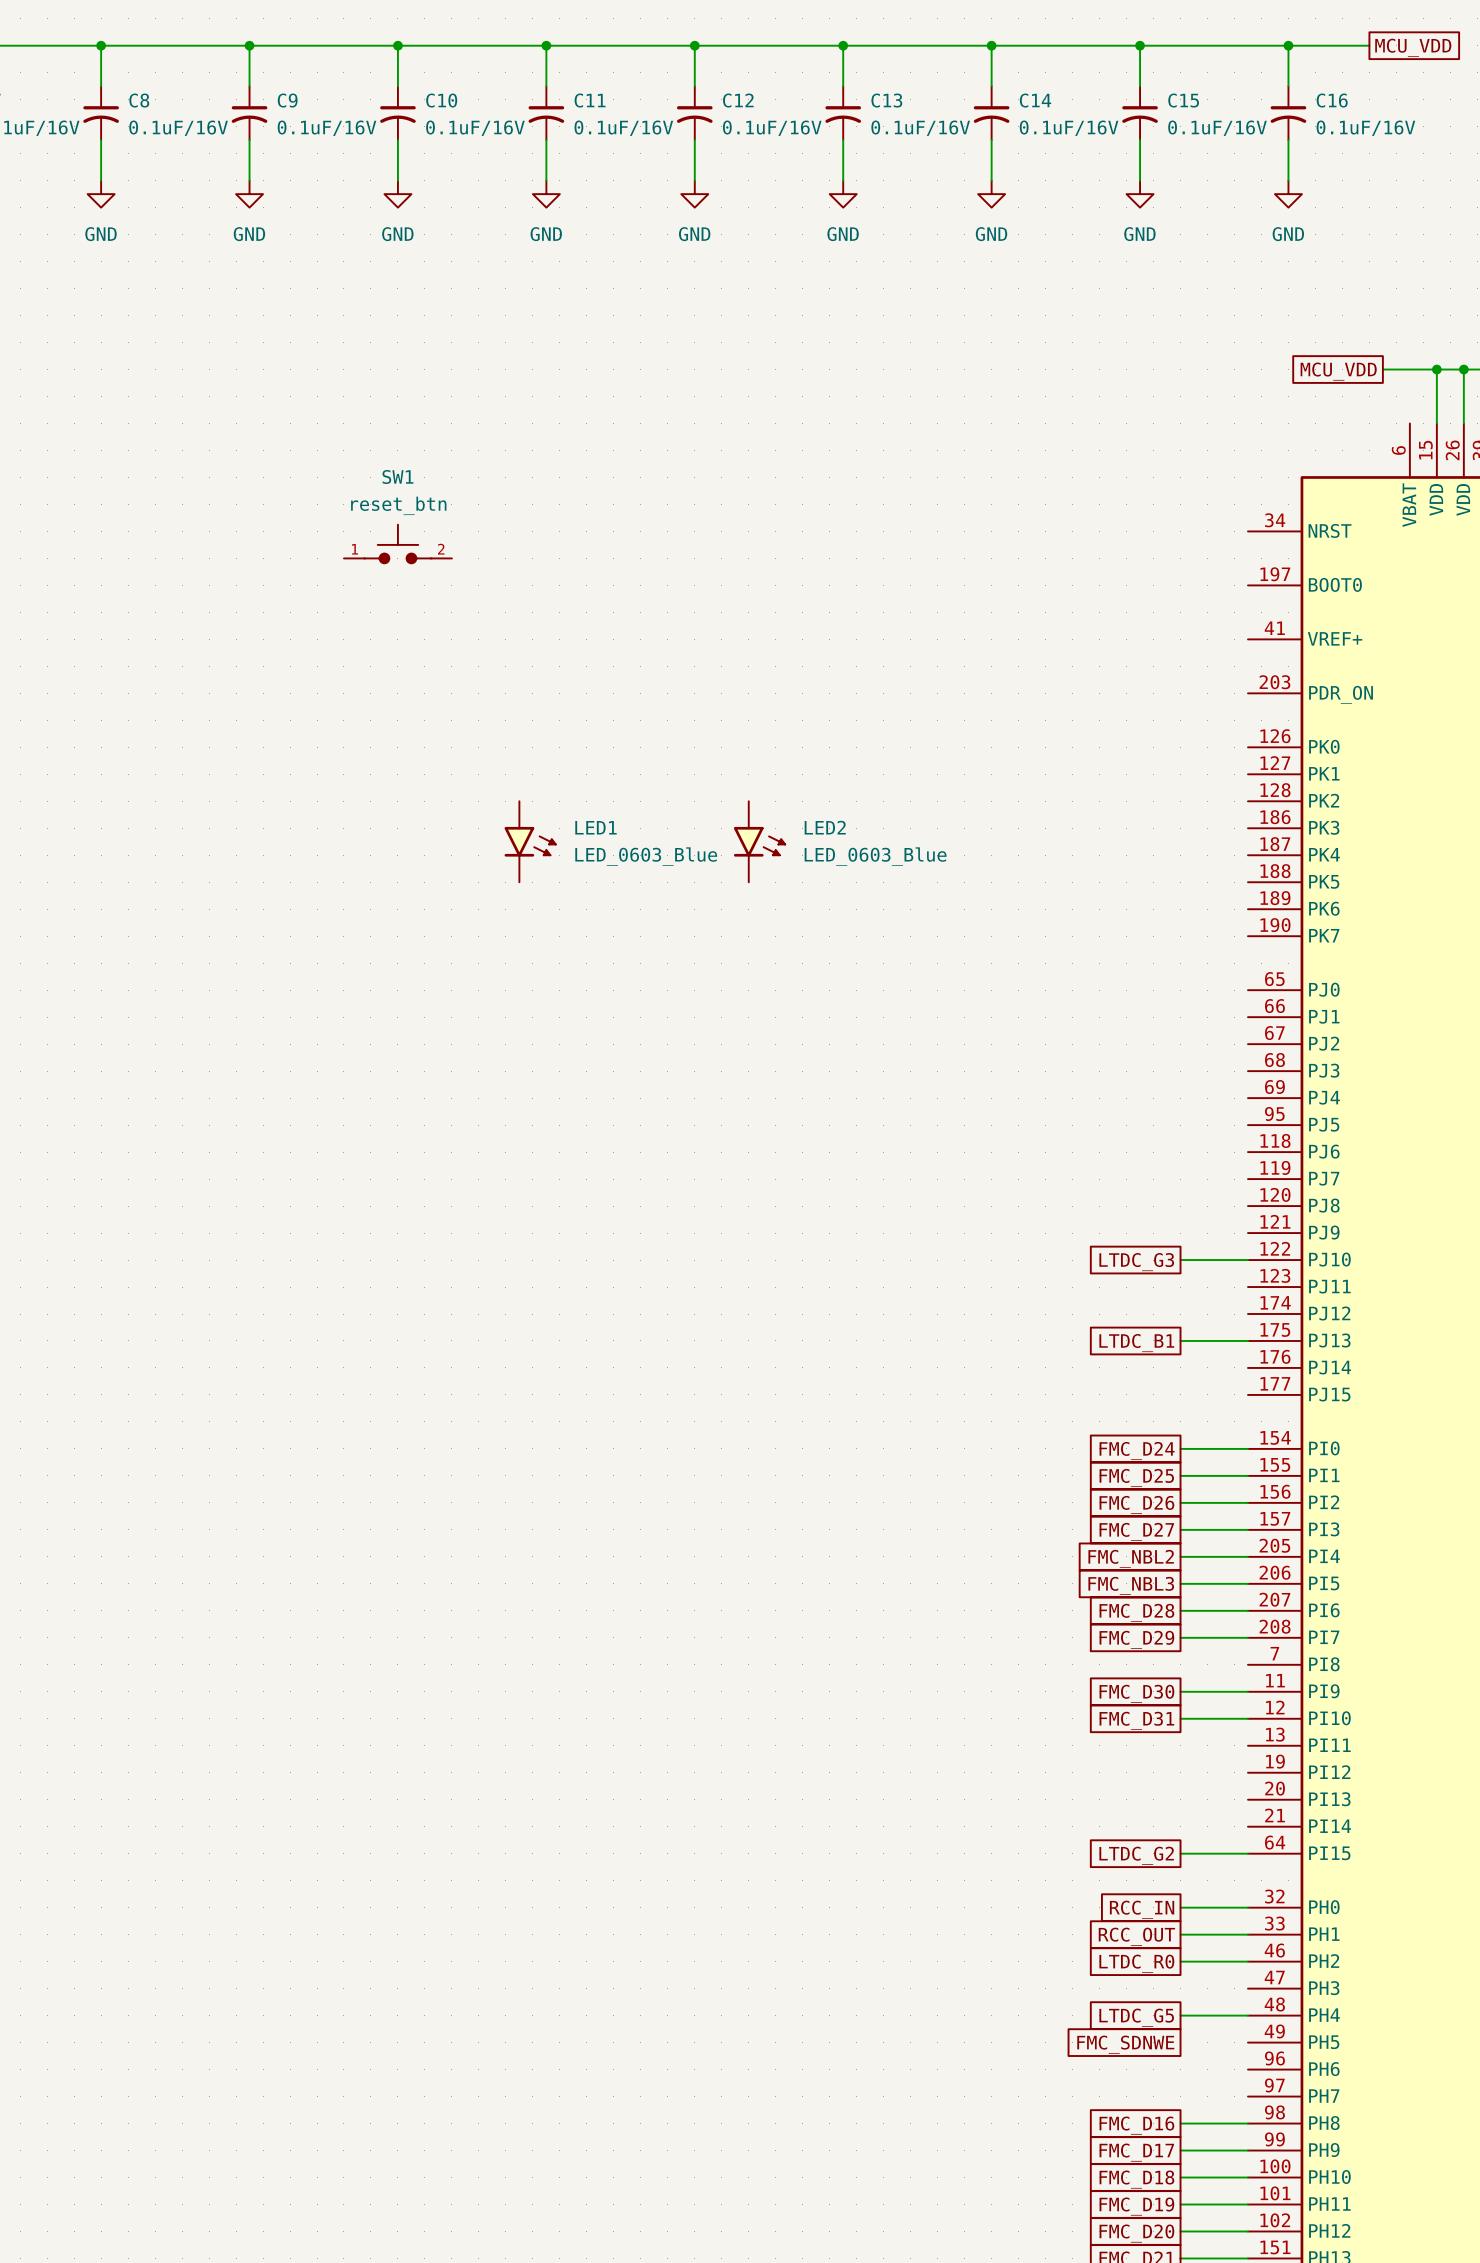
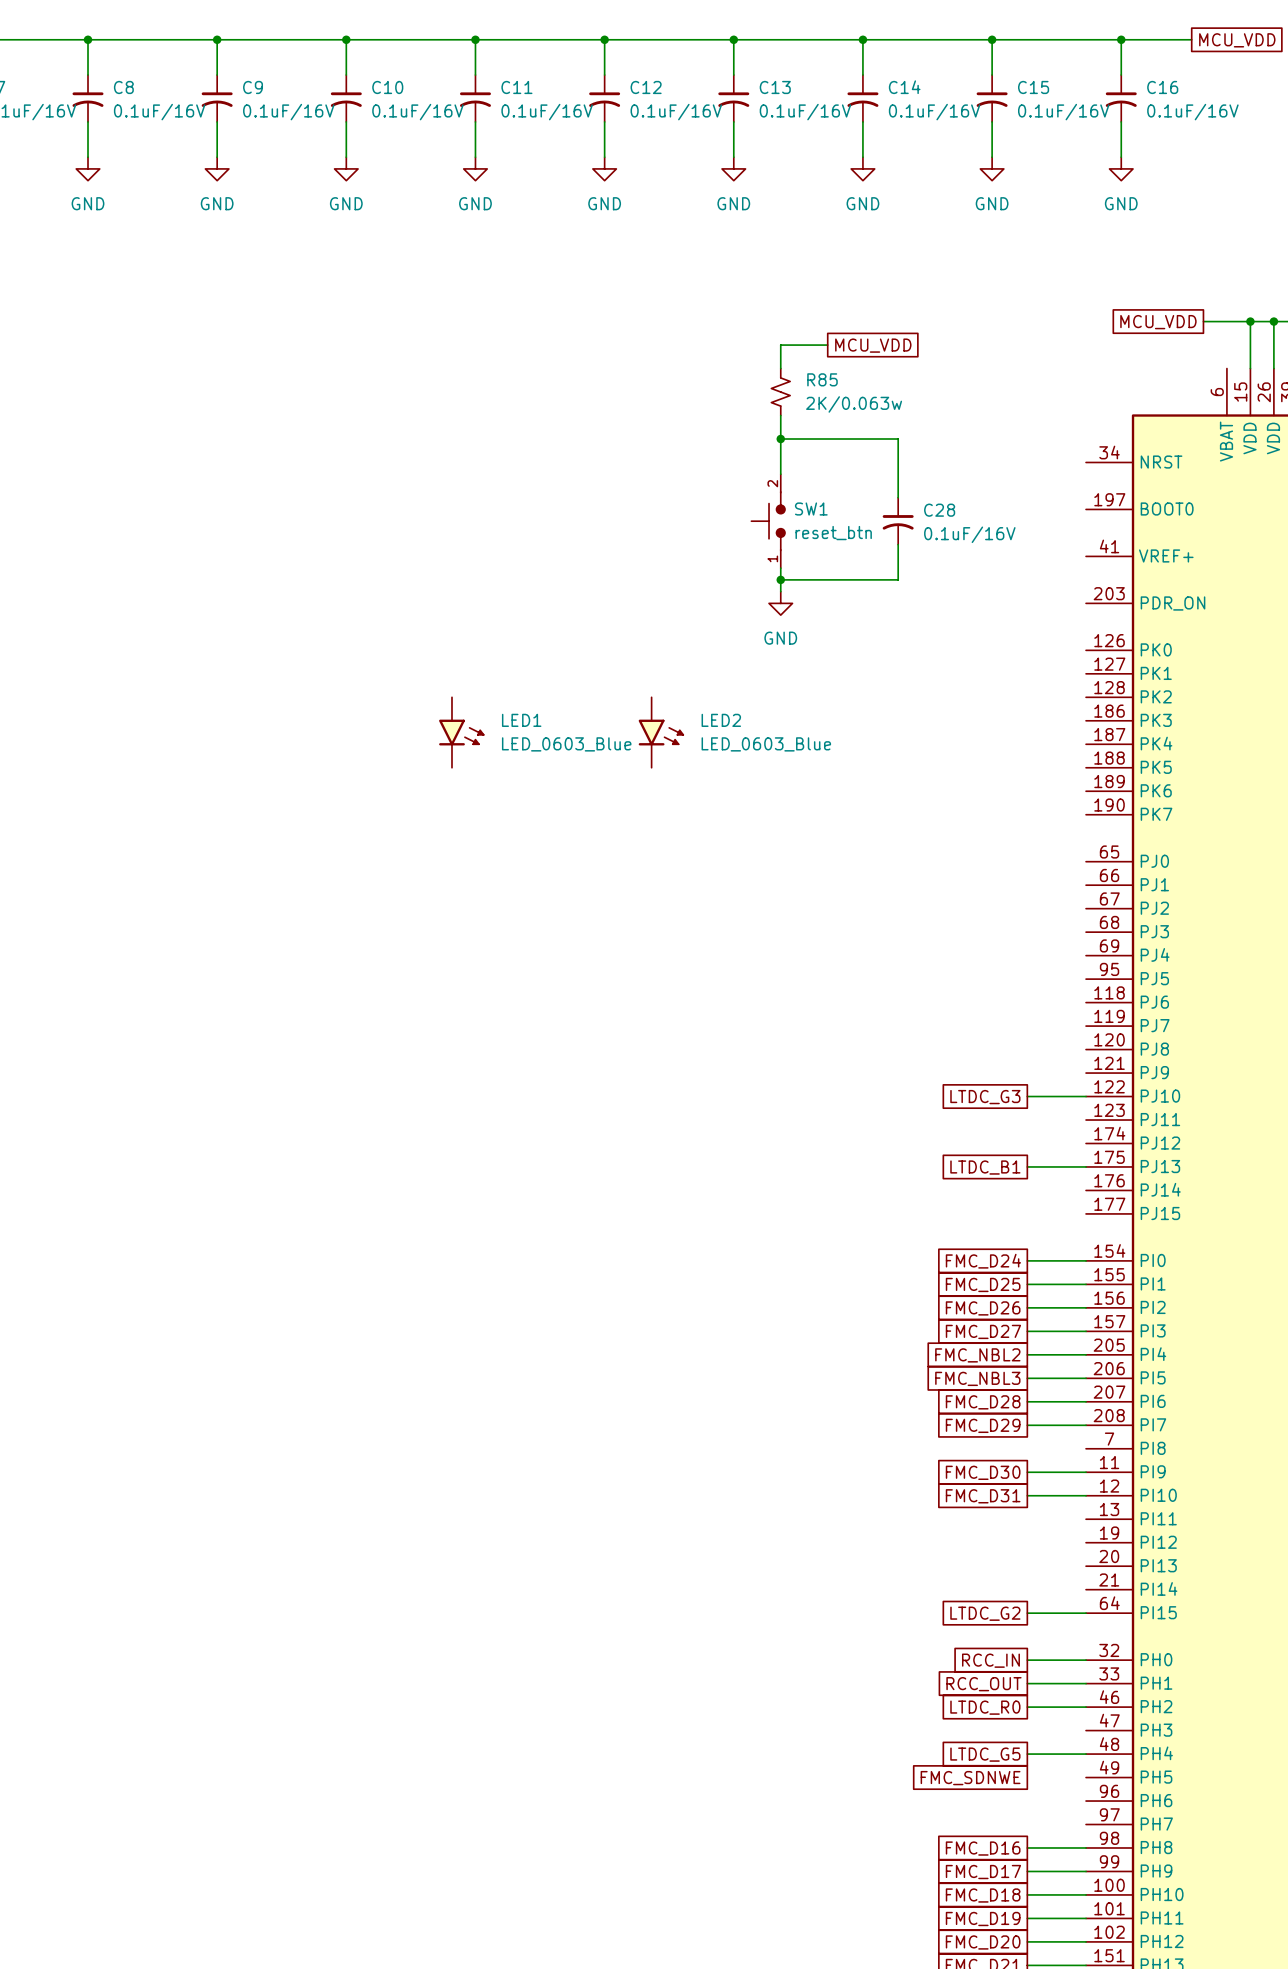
wire: none -> (827, 345) (780, 345) (780, 368)
global label: none -> MCU_VDD (873, 345)
R85: none -> 2K/0.063w (780, 392)
SW1 name position: SW1 (397, 476) -> SW1 (811, 509)
wire: none -> (780, 415) (780, 474)
wire: none -> (780, 438) (898, 438) (898, 497)
junction: none -> (780, 438)
SW1 value position: reset_btn (398, 505) -> reset_btn (833, 533)
SW1 rotation: 0° (397, 543) -> 90° counterclockwise (768, 521)
SW1 position: (397, 543) -> (768, 521)
C28: none -> 0.1uF/16V (898, 521)
wire: none -> (898, 544) (898, 579) (780, 579)
wire: none -> (780, 568) (780, 591)
junction: none -> (780, 579)
power symbol: none -> GND (780, 603)

